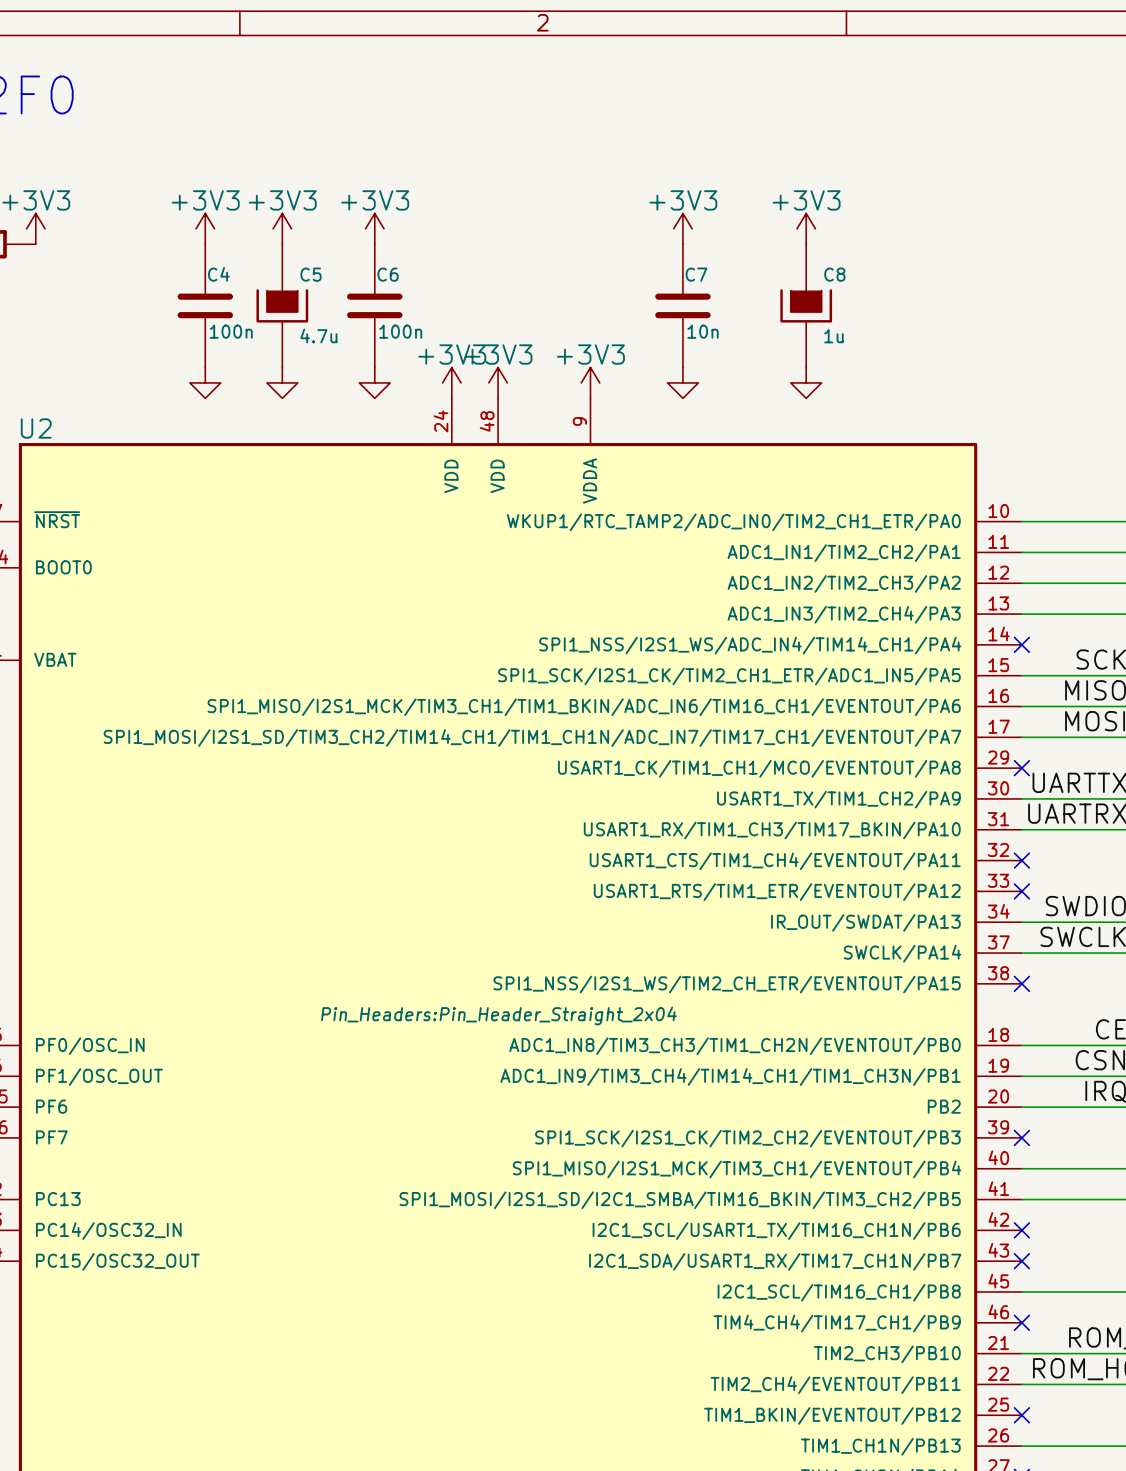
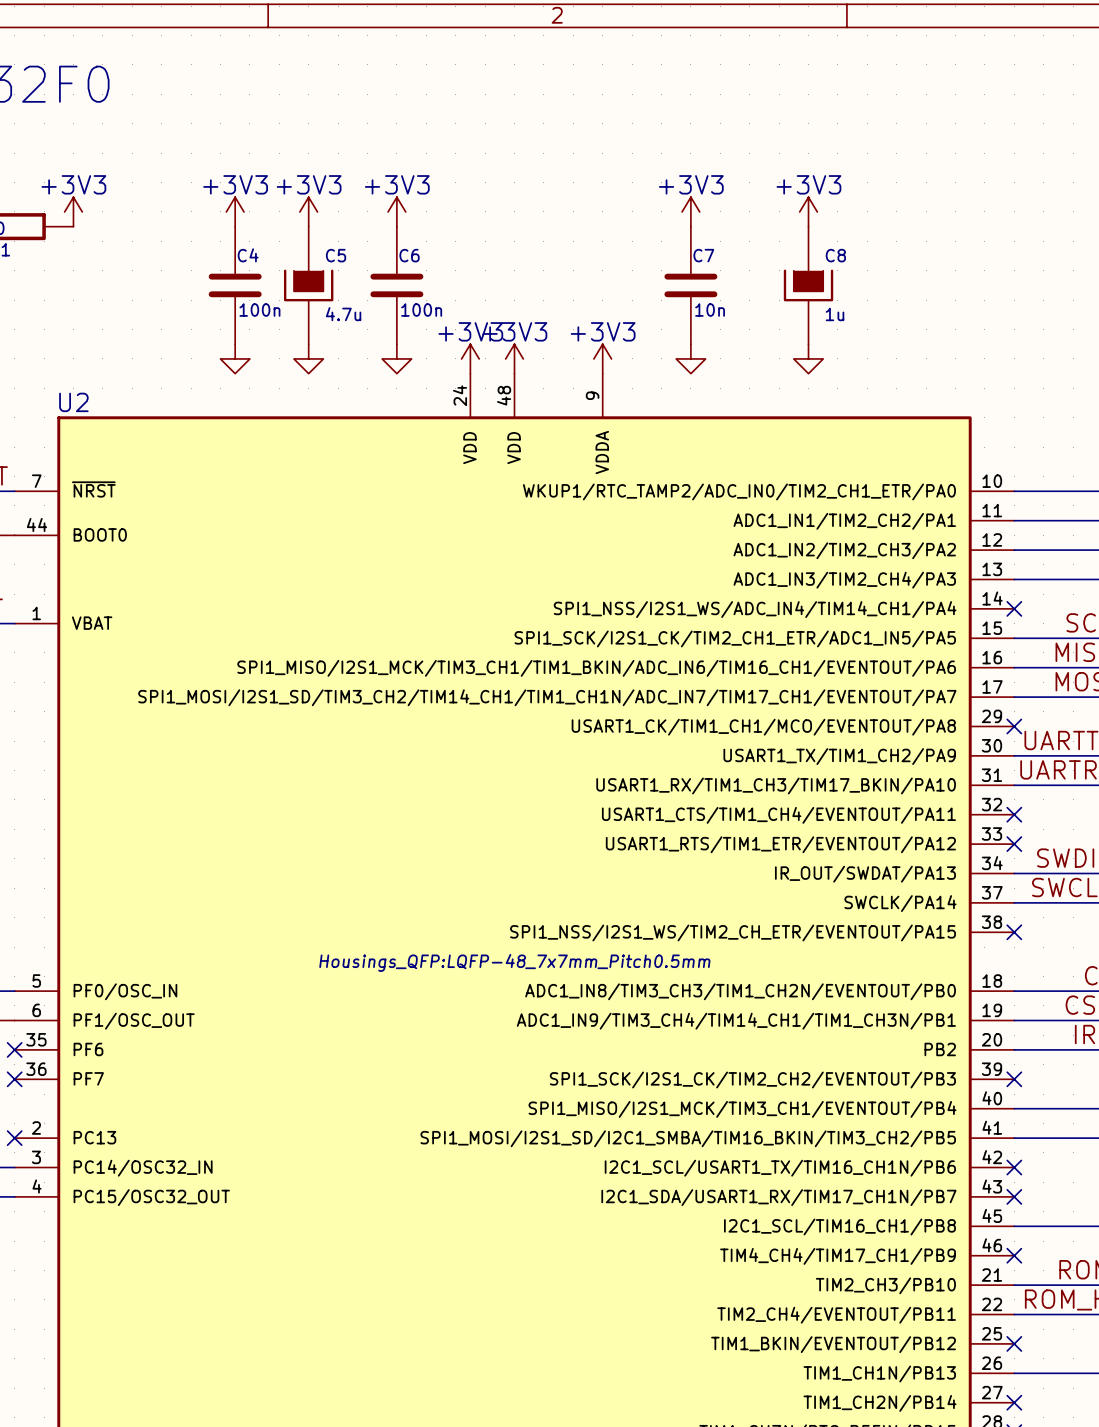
U2 text: Pin_Headers:Pin_Header_Straight_2x04 (498, 1015) -> Housings_QFP:LQFP-48_7x7mm_Pitch0.5mm (514, 962)

